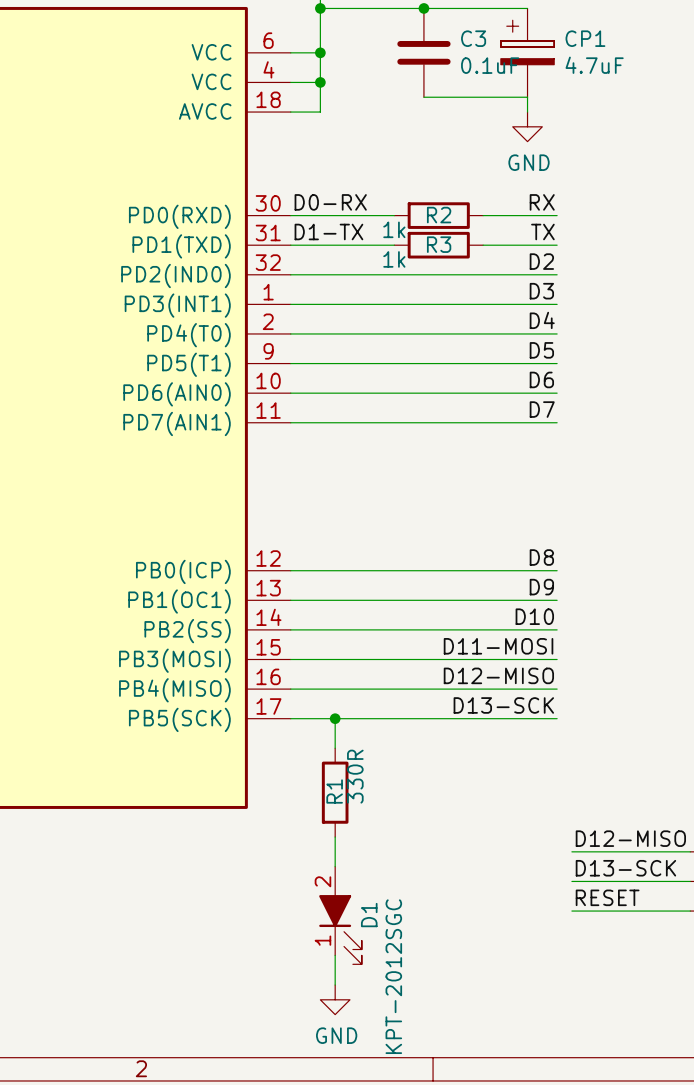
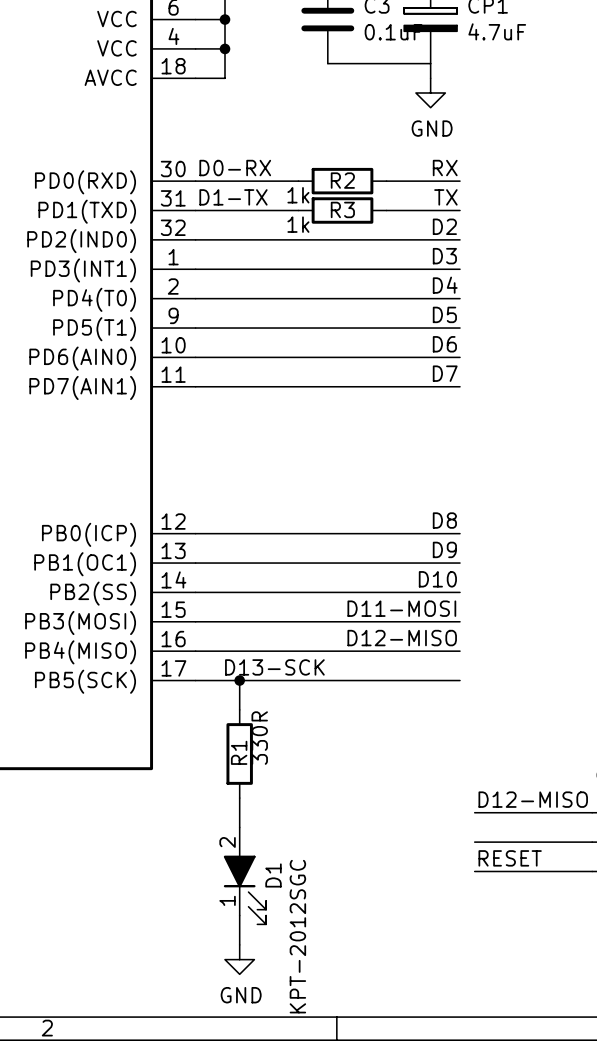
label: none -> D13-SCK (274, 667)
label: D13-SCK (503, 705) -> none
label: D13-SCK (625, 868) -> none

